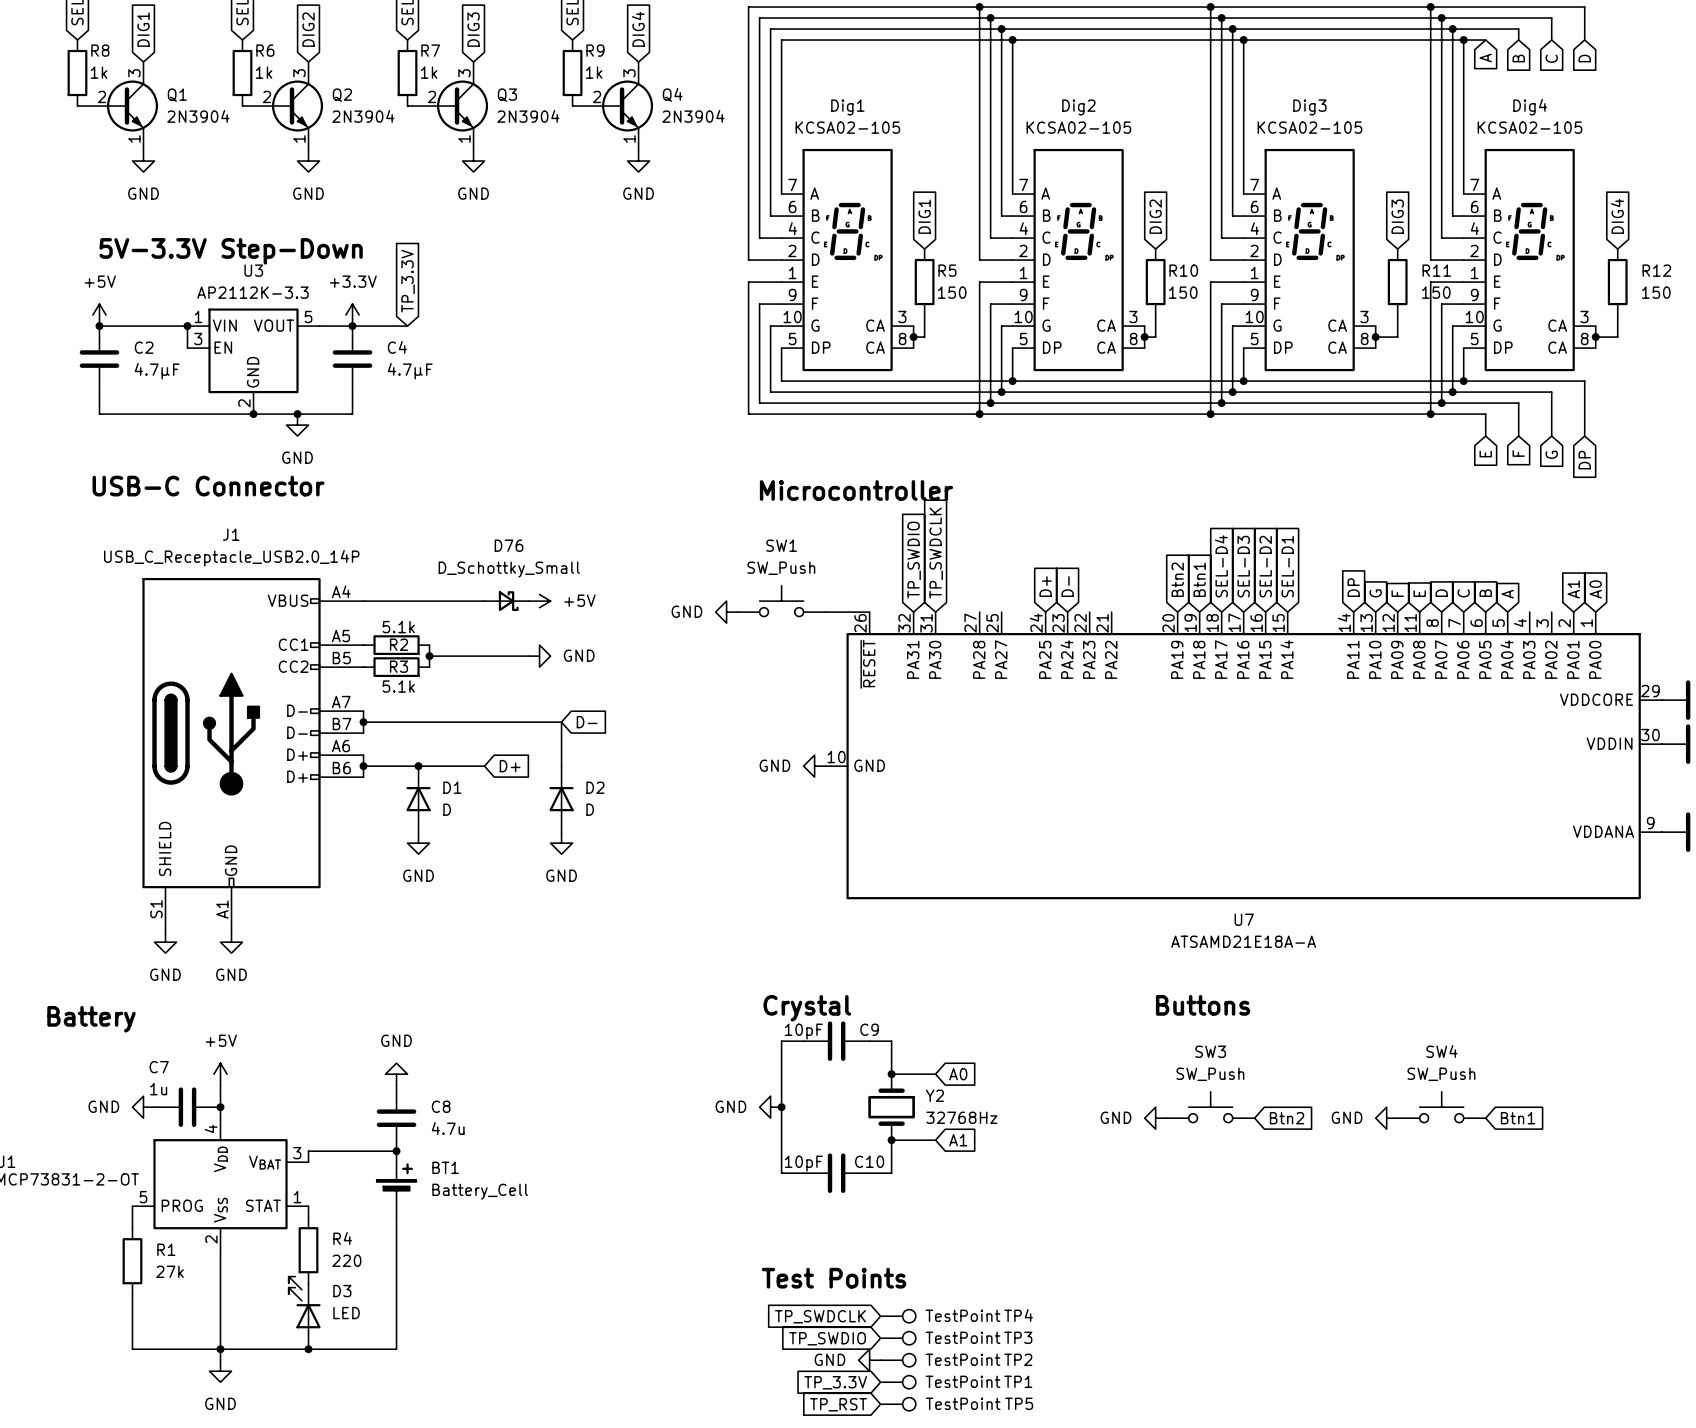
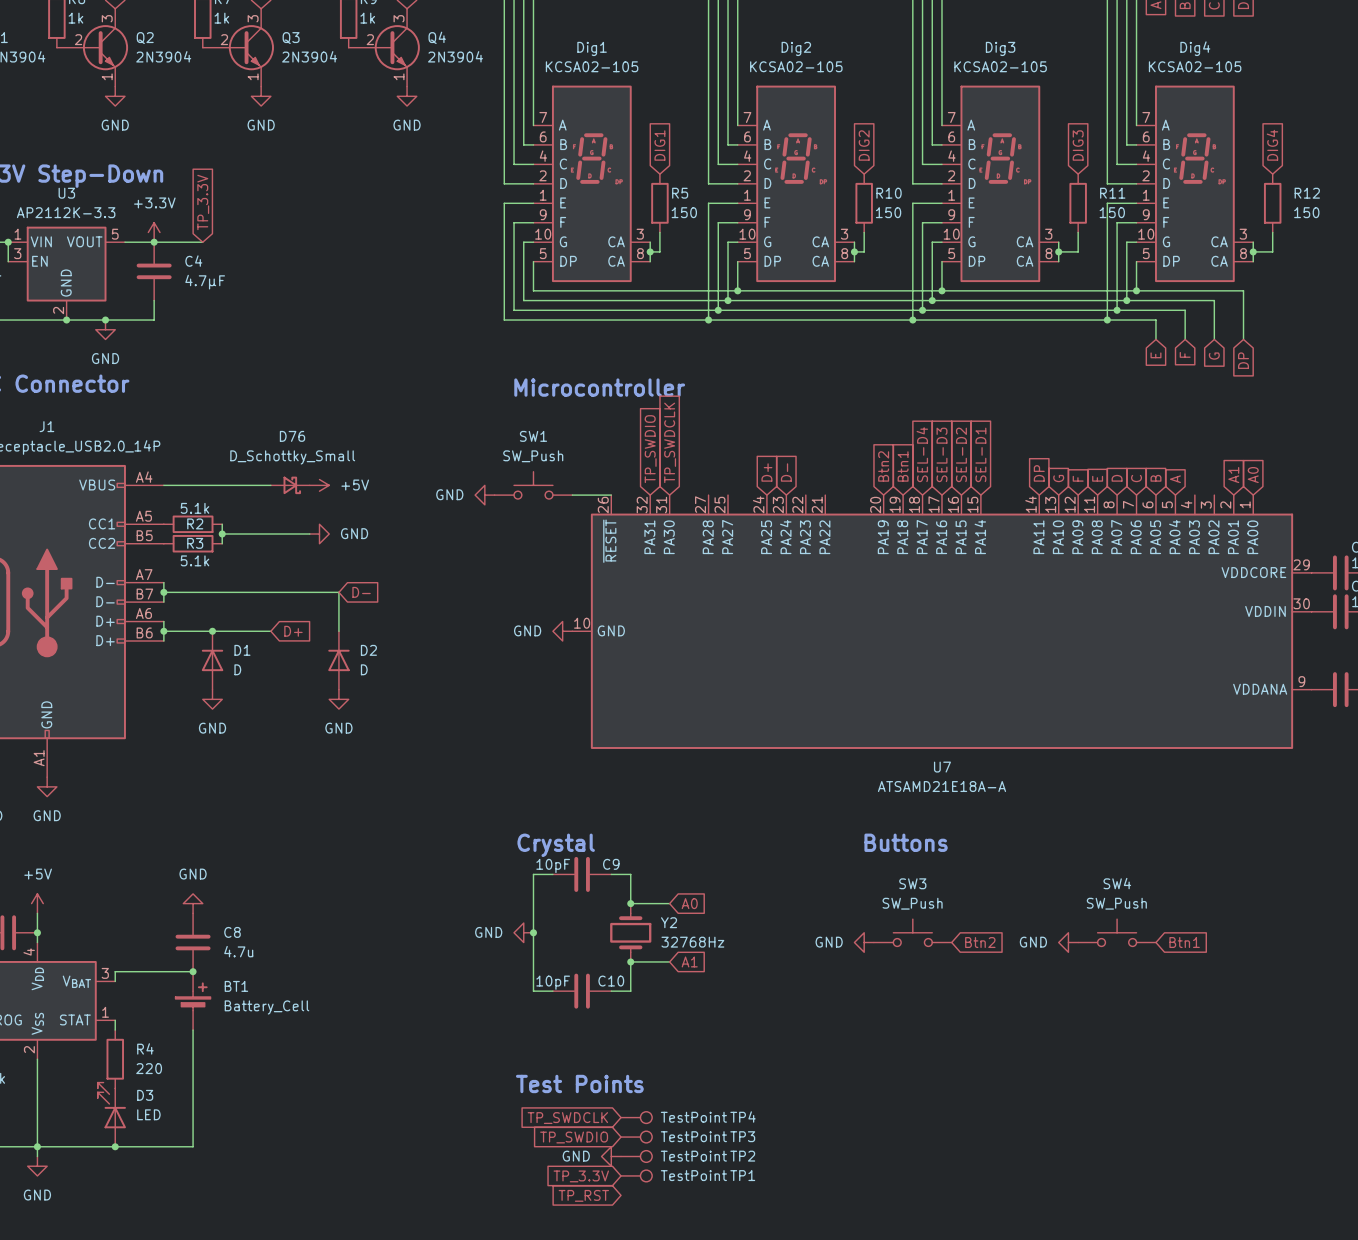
TP5: TestPoint (898, 1404) -> none

